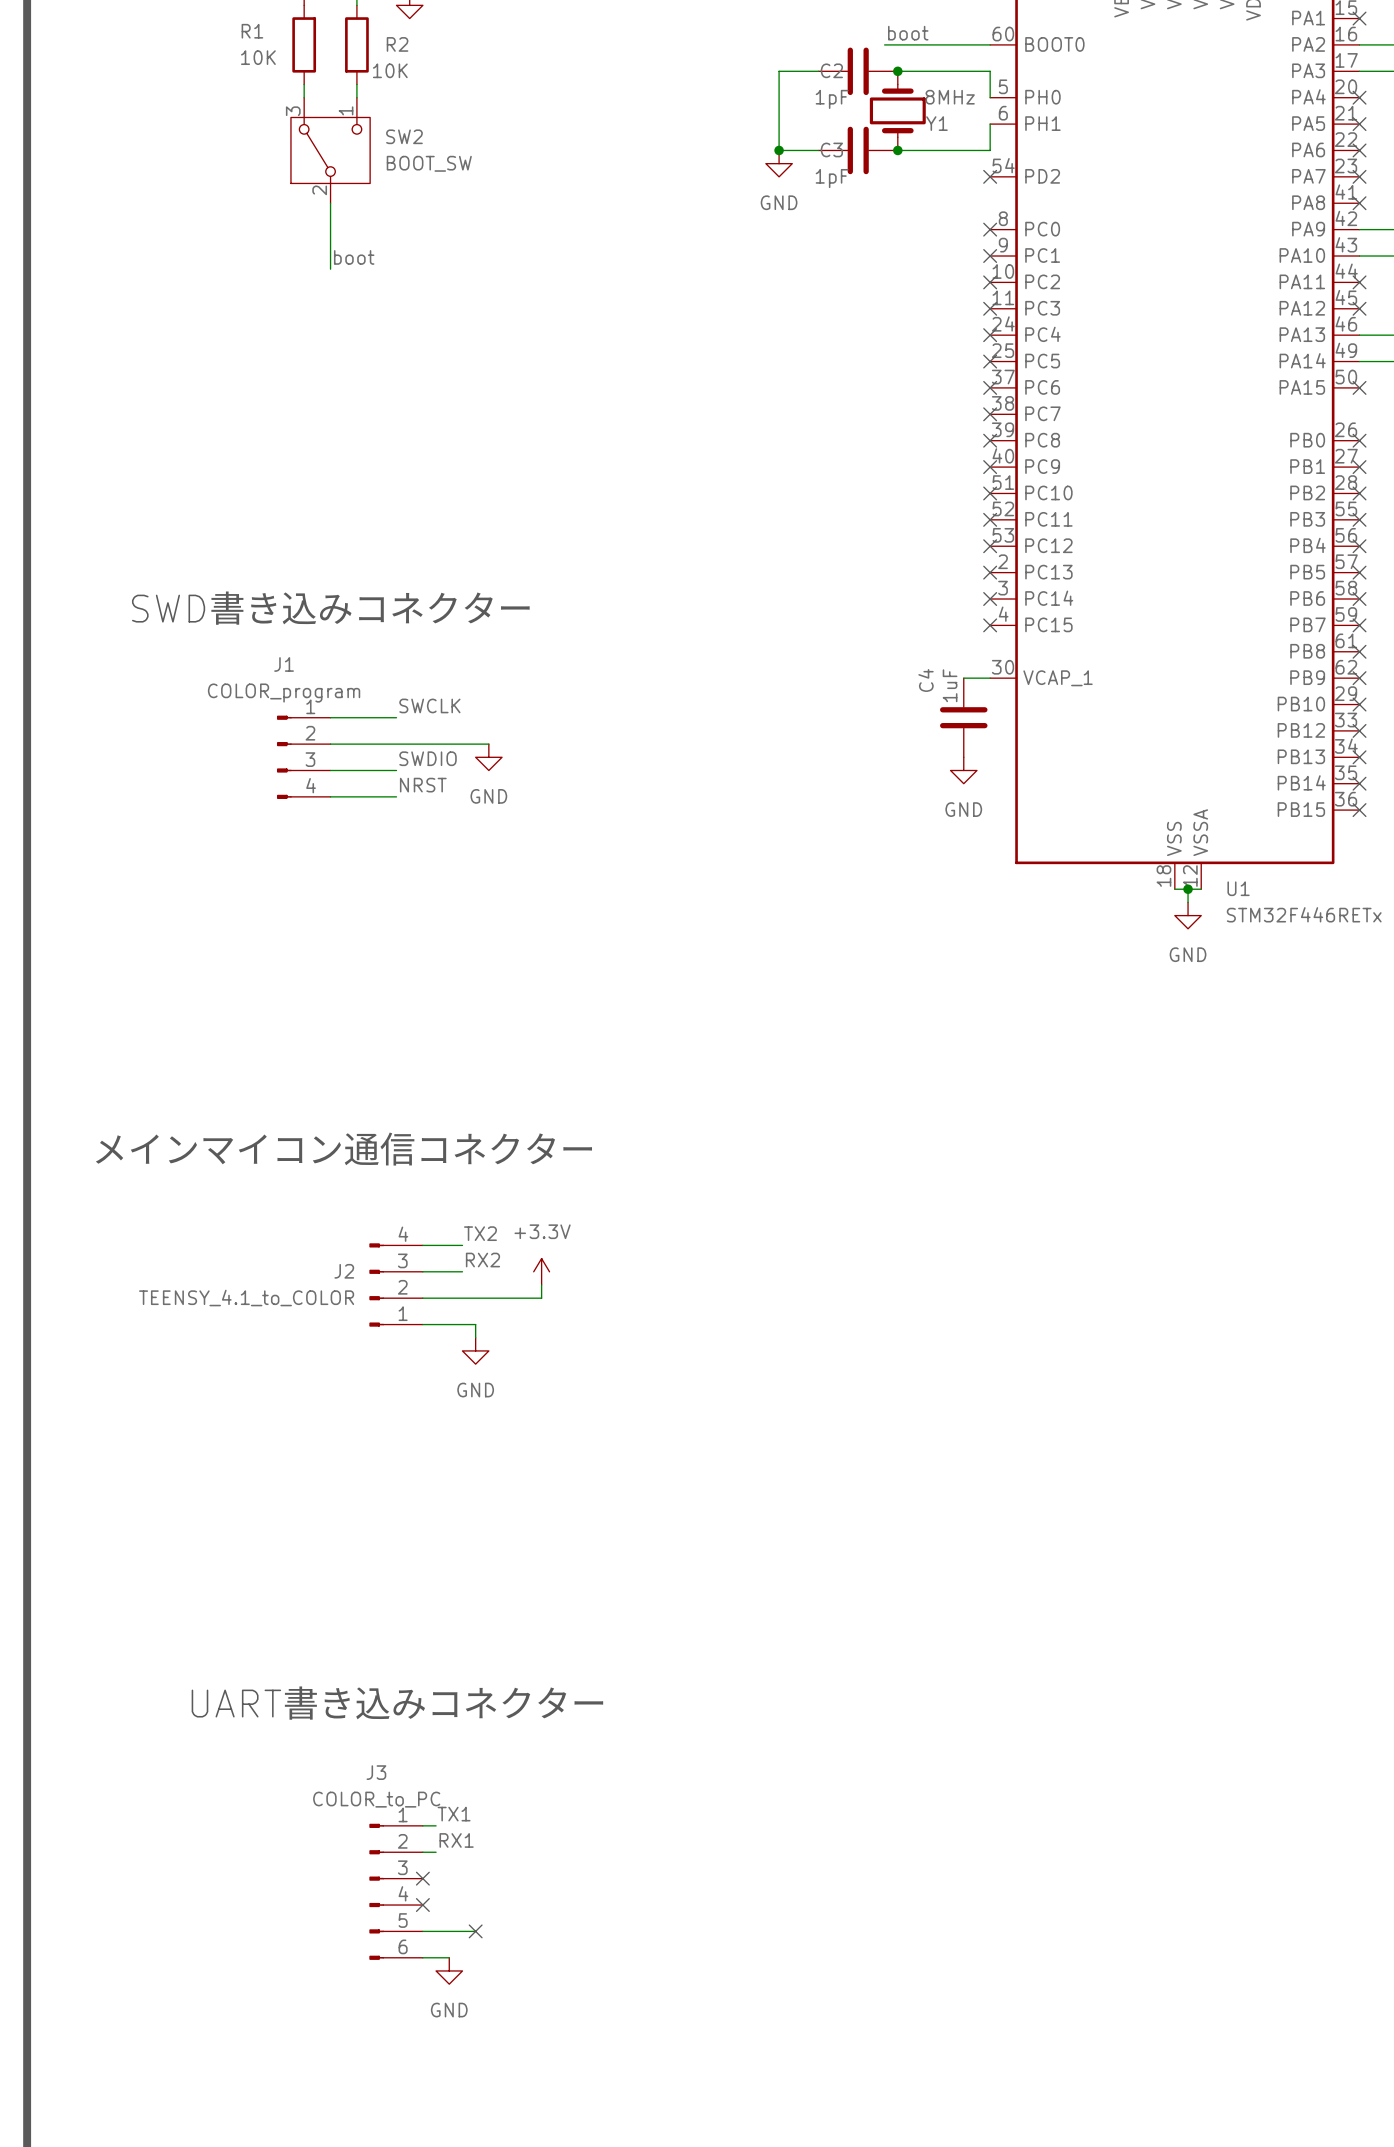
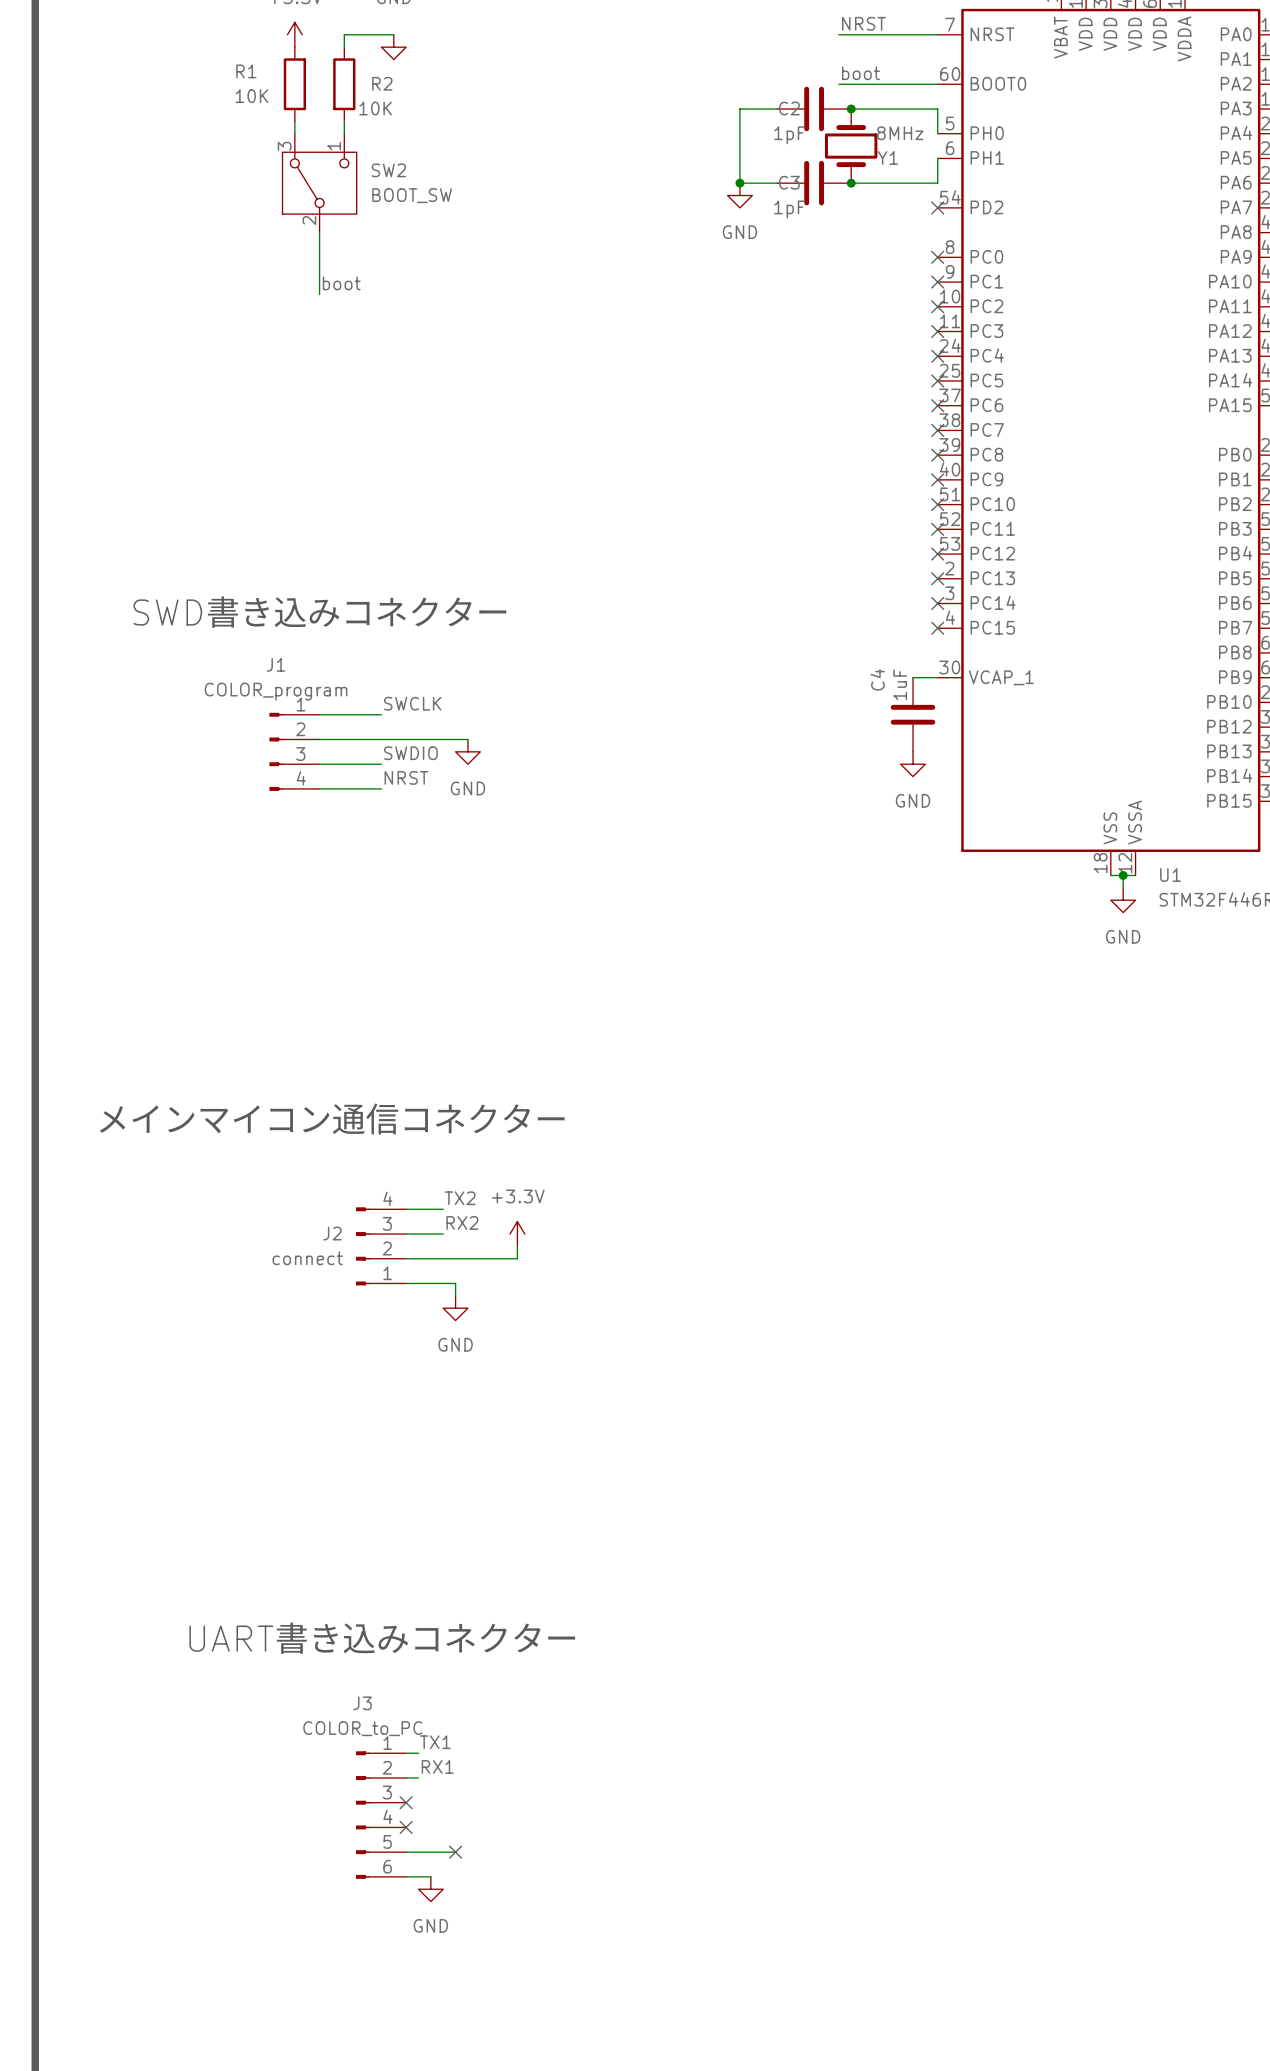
J2 value: TEENSY_4.1_to_COLOR (246, 1298) -> connect (307, 1258)

